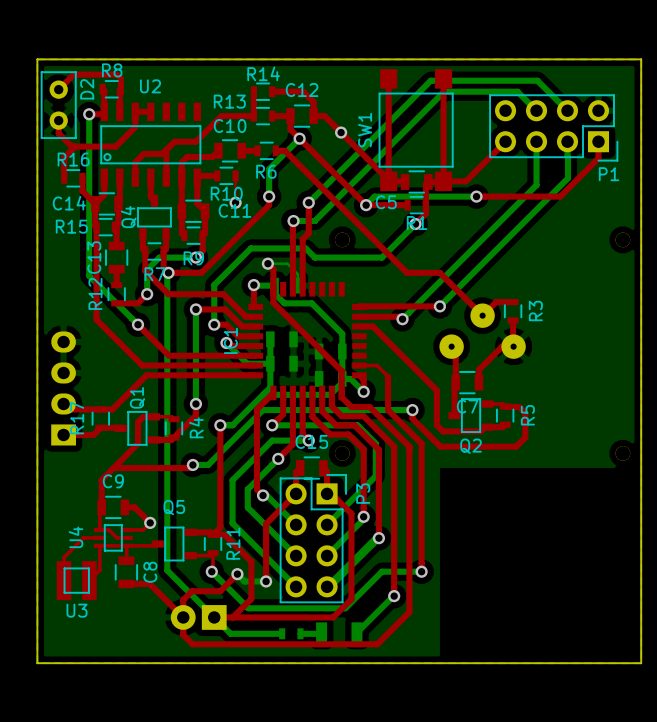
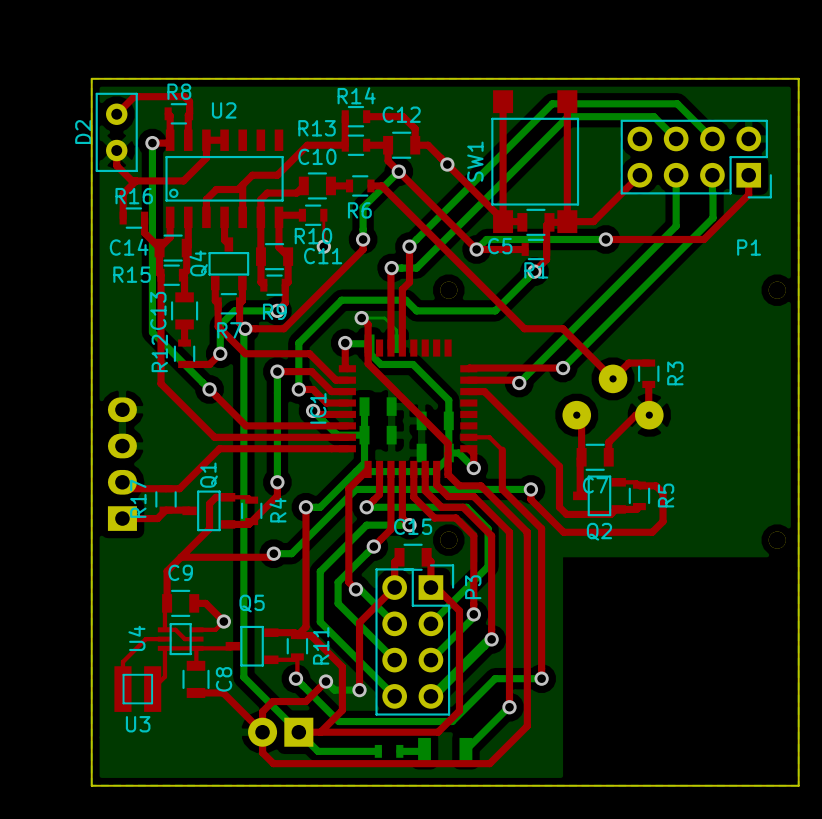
D2 name position: D2 (87, 89) -> D2 (83, 132)
P1 name position: P1 (609, 174) -> P1 (749, 247)

